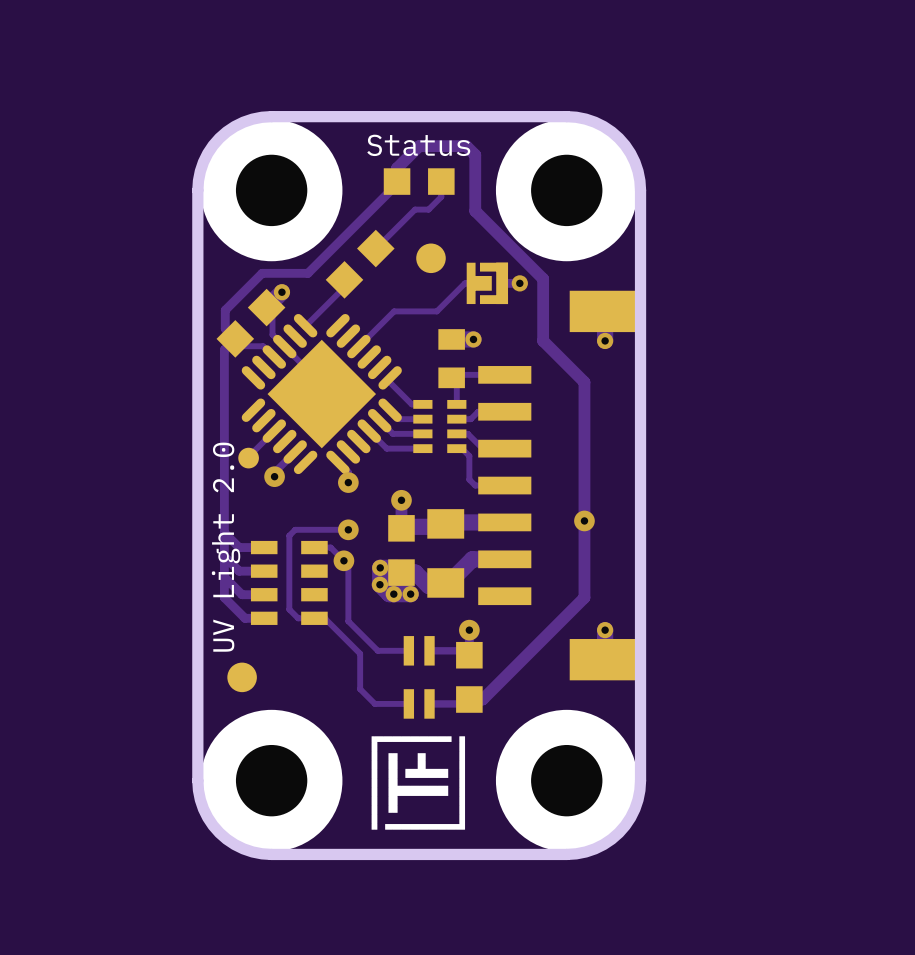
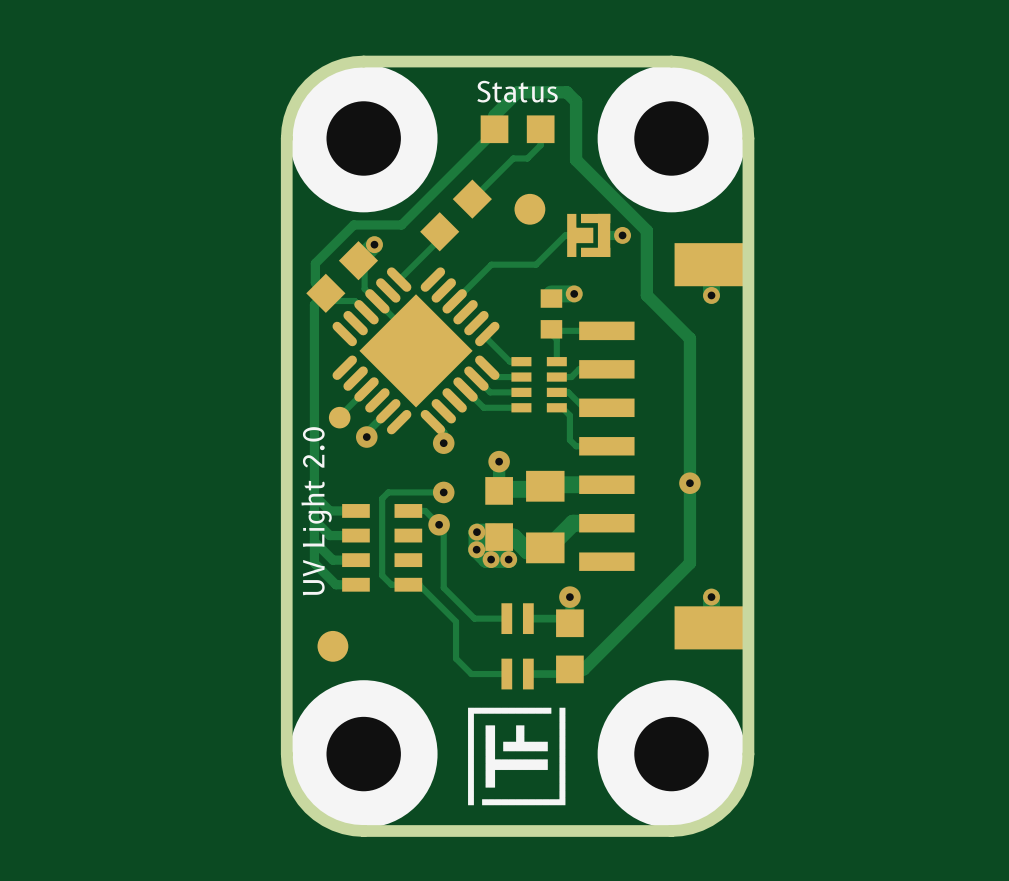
part footprint: [438, 329, 465, 389] -> [540, 289, 563, 339]

